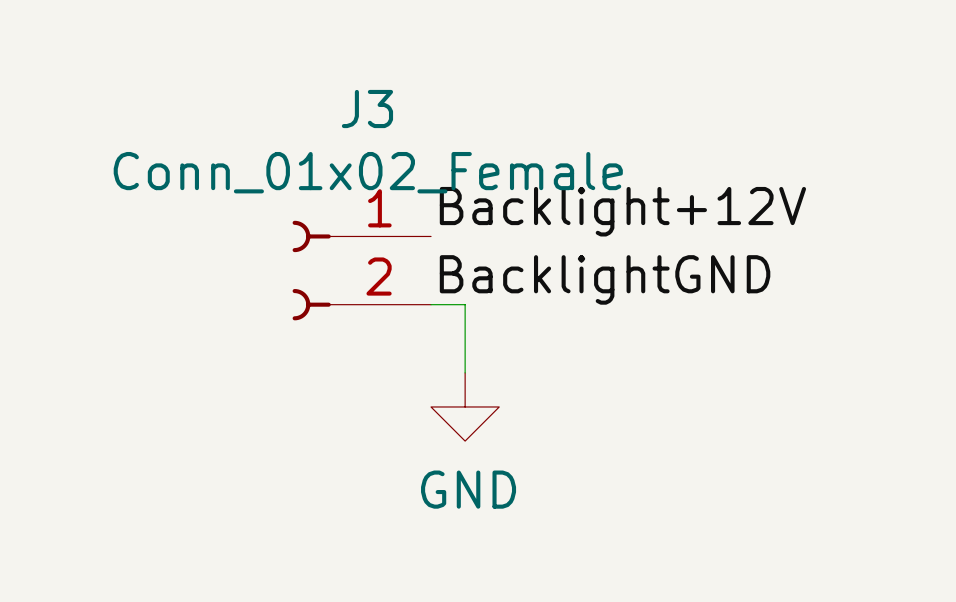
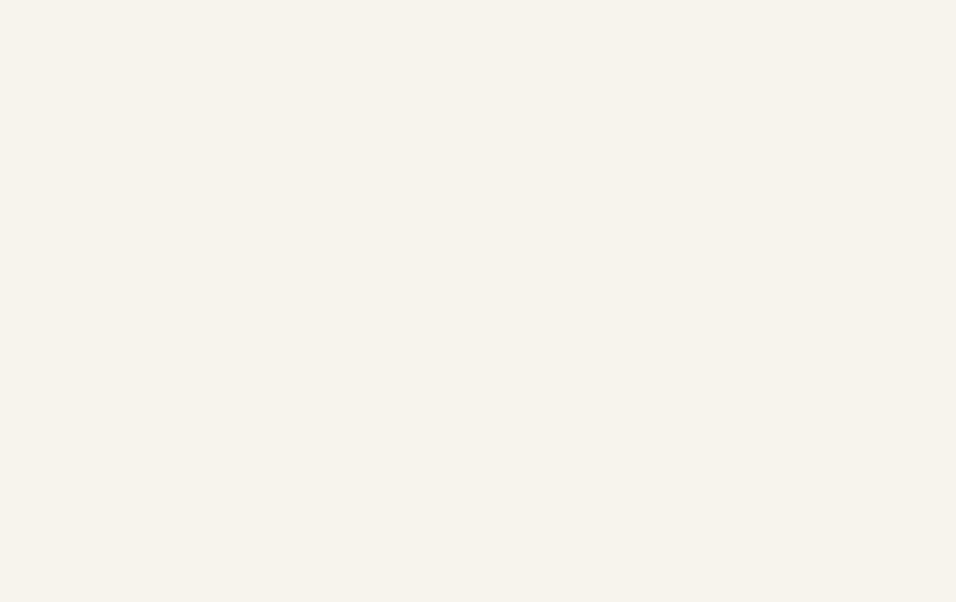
label: Backlight+12V (622, 211) -> none
J3: Conn_01x02_Female (361, 270) -> none
label: BacklightGND (605, 279) -> none
wire: (431, 304) (465, 304) (465, 372) -> none
power symbol: GND (465, 406) -> none

